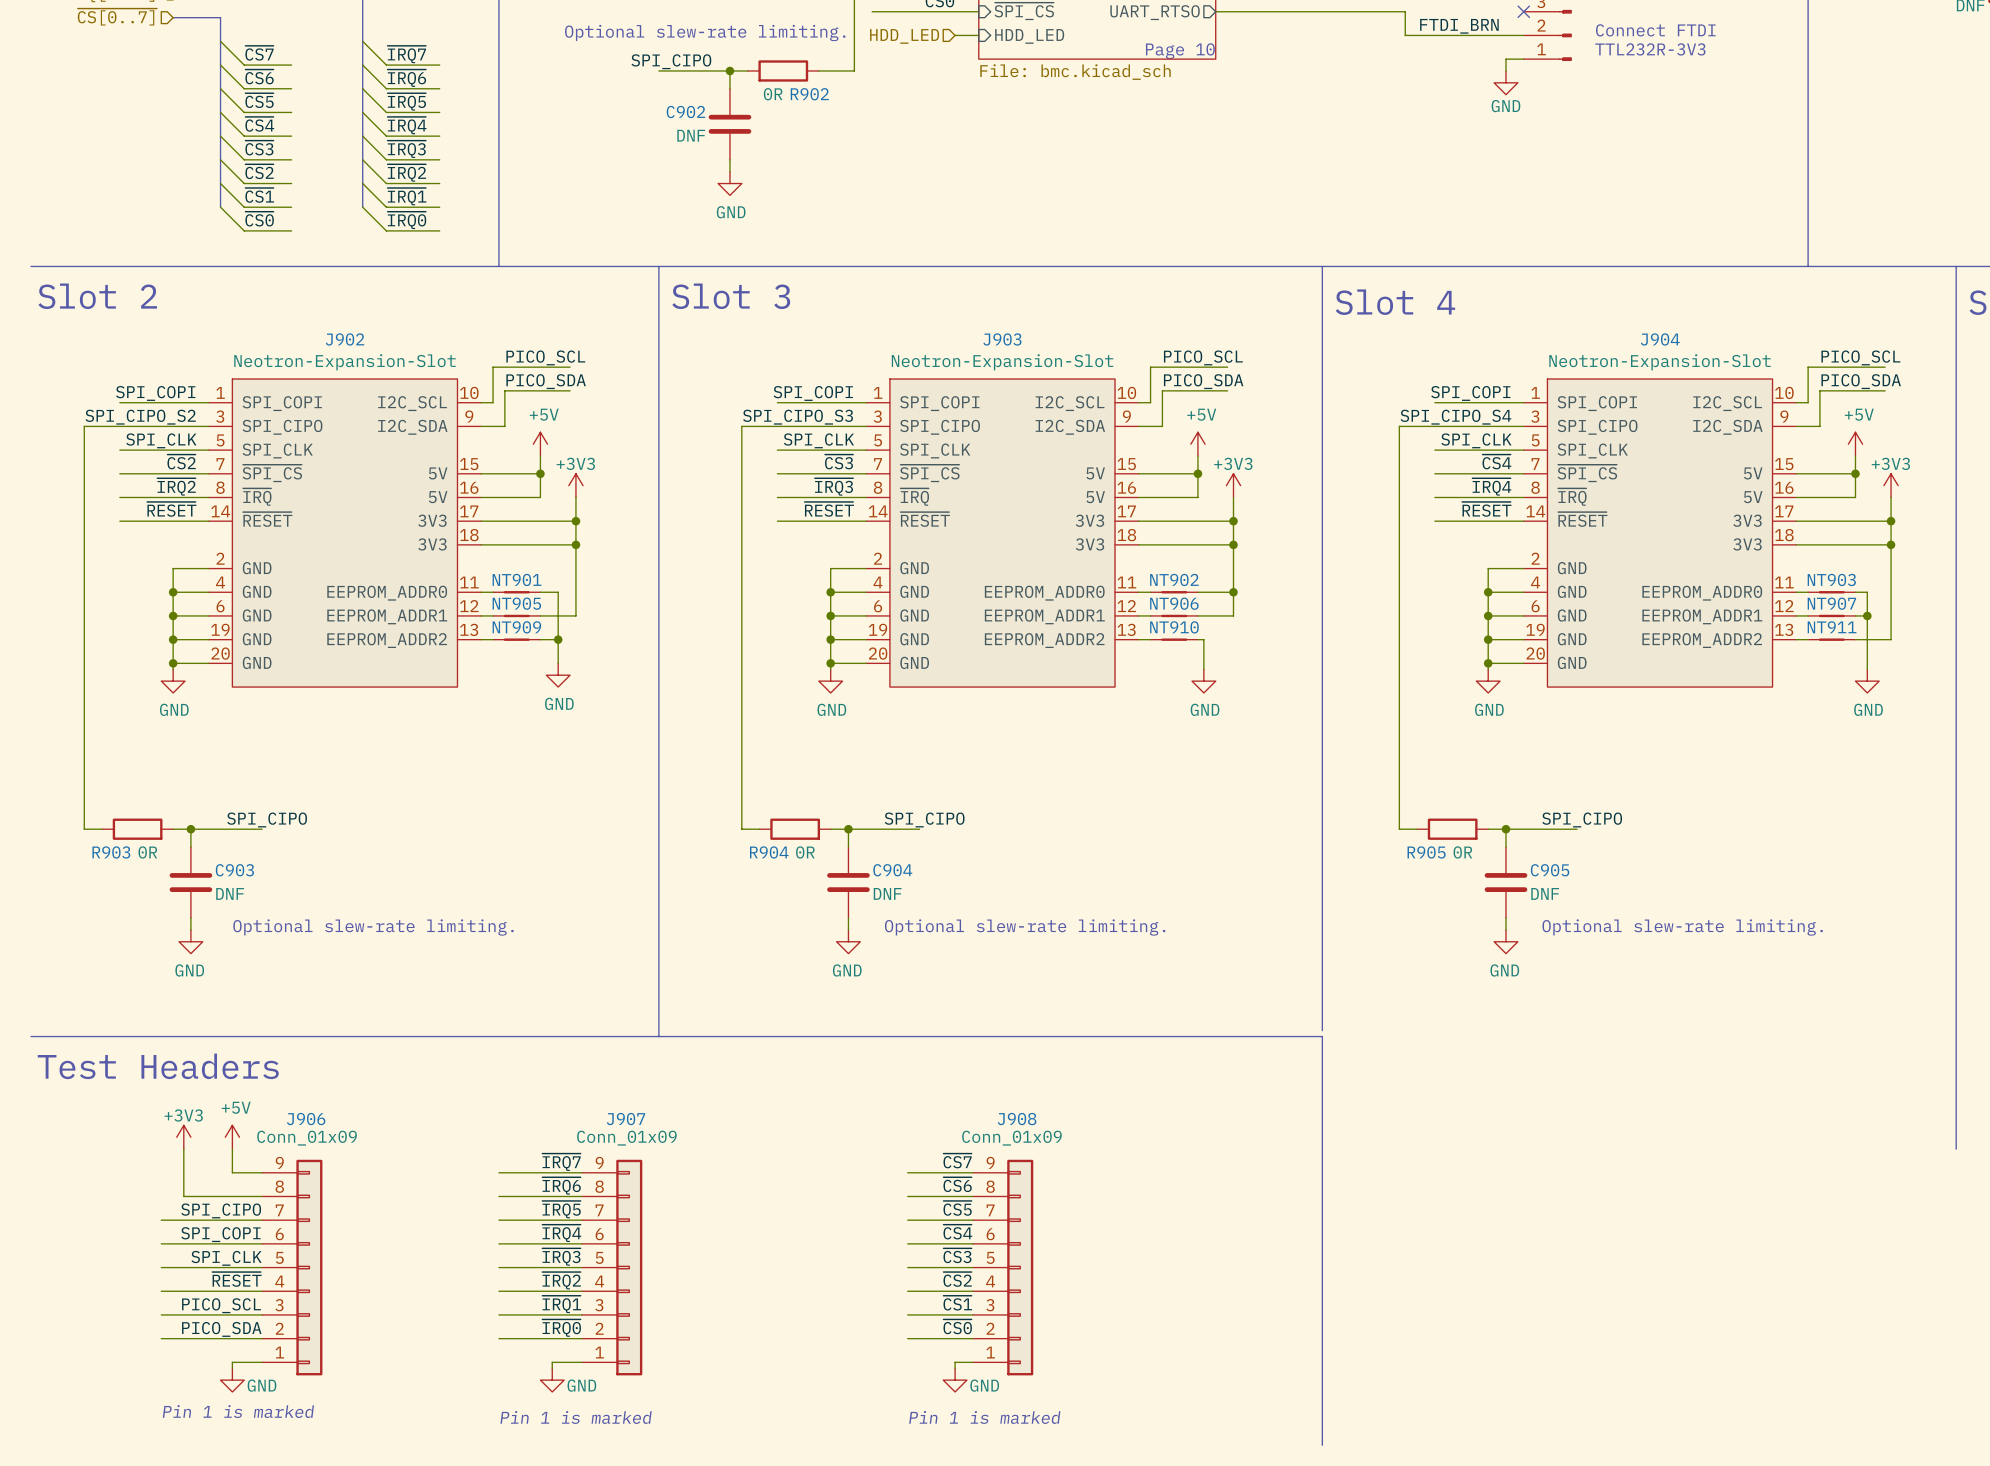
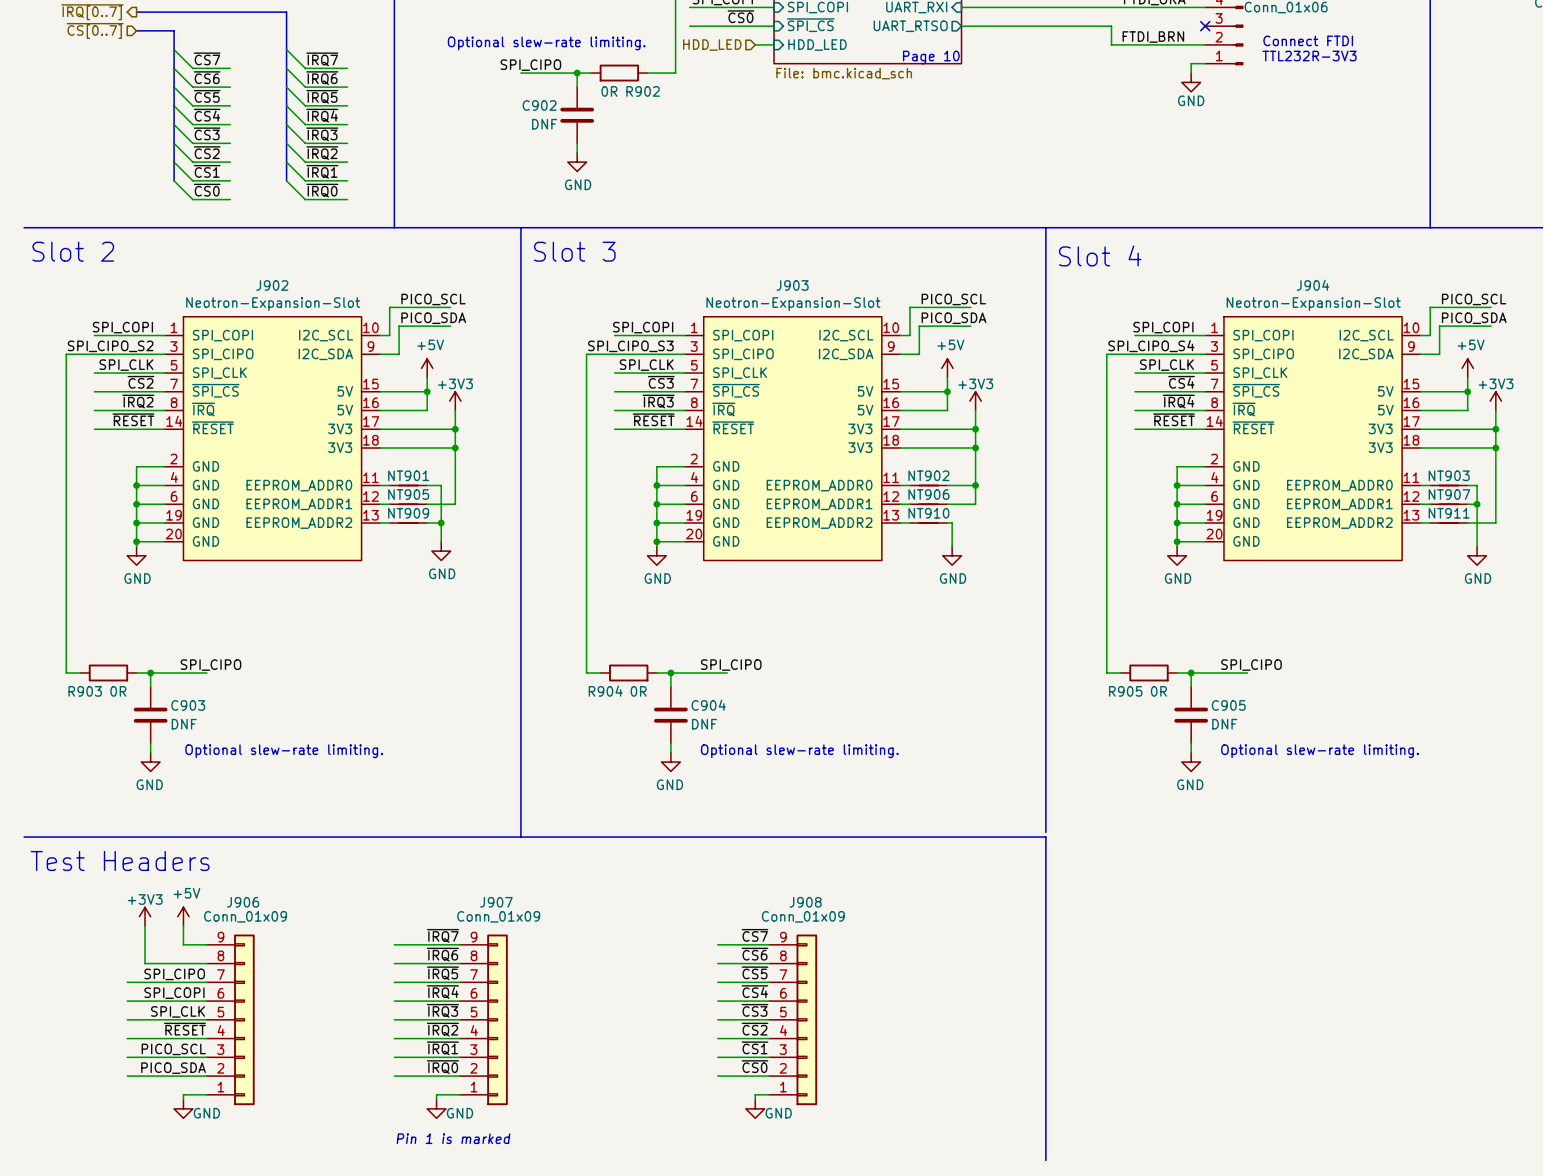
text: Pin 1 is marked (238, 1411) -> none
text: Pin 1 is marked (984, 1417) -> none

